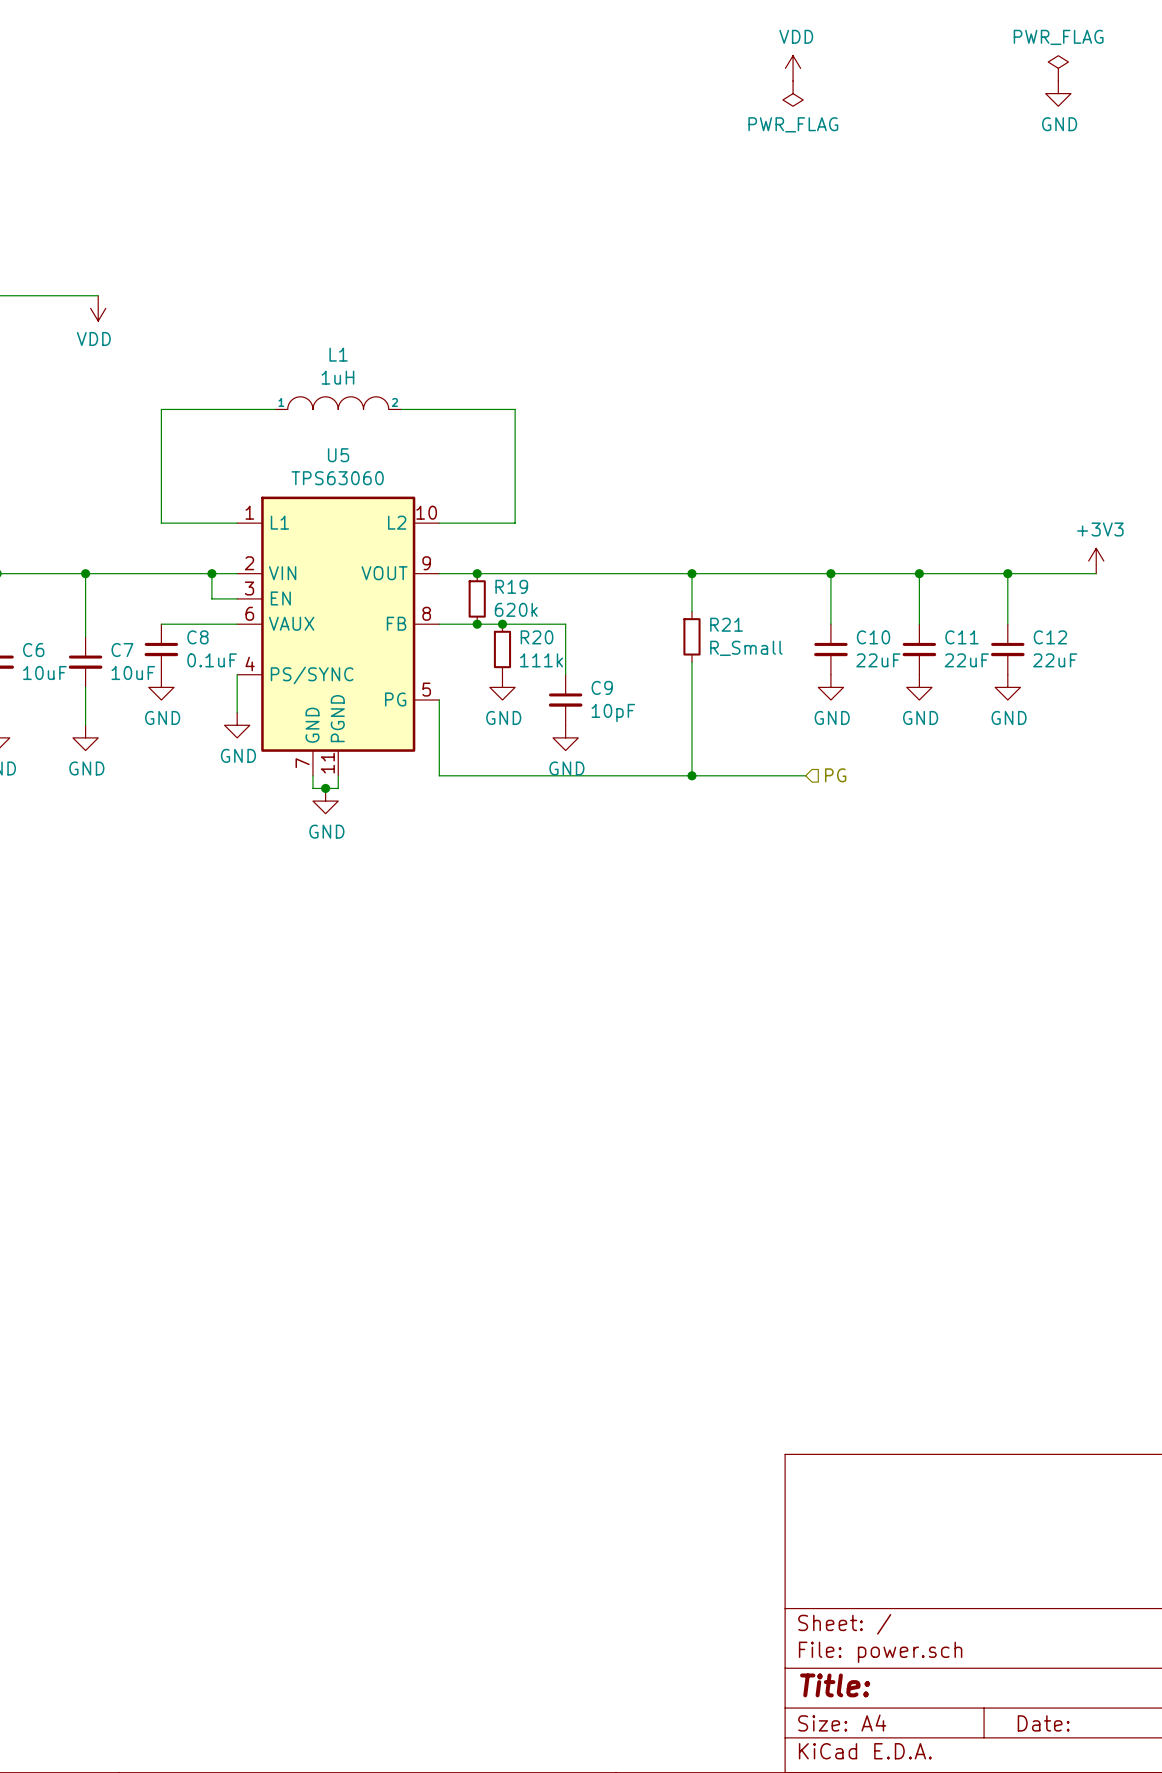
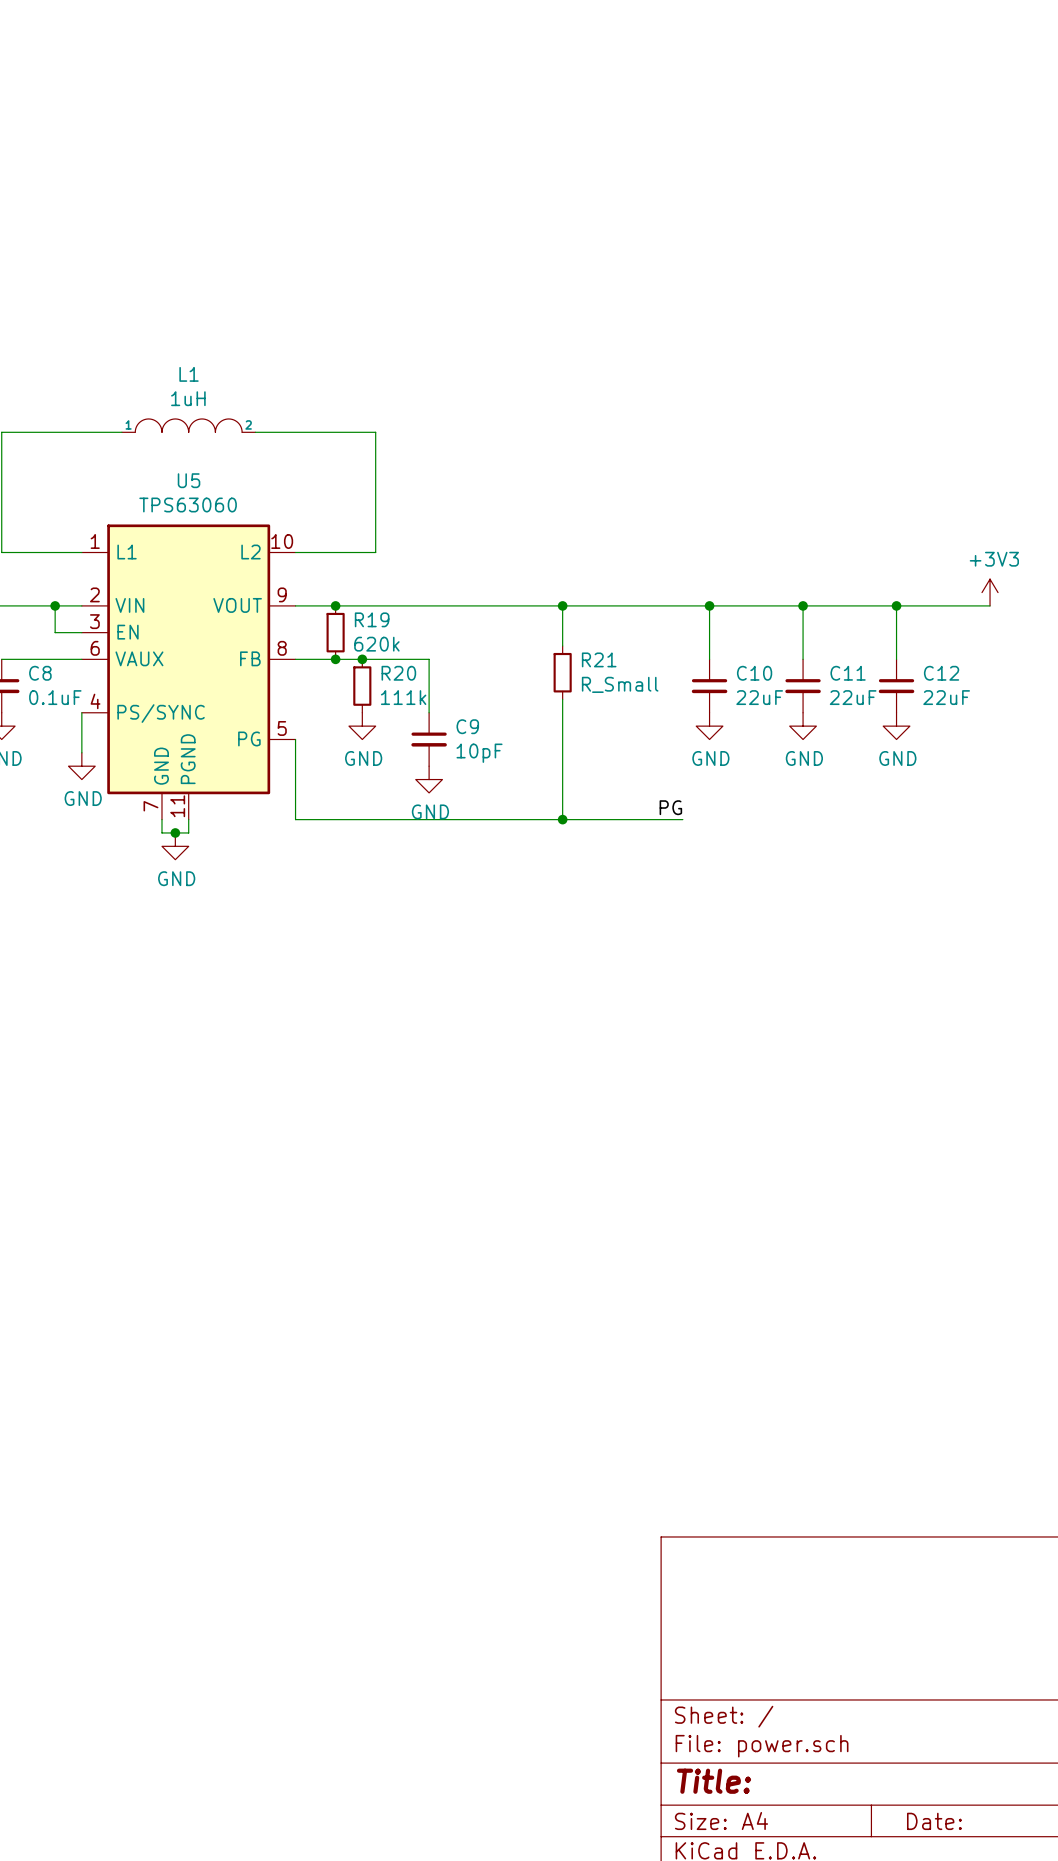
power symbol: VDD (793, 68) -> none
power symbol: PWR_FLAG (1058, 68) -> none
power symbol: PWR_FLAG (793, 93) -> none
power symbol: GND (1058, 93) -> none
label: none -> PG (670, 807)
hierarchical label: PG (835, 775) -> none

